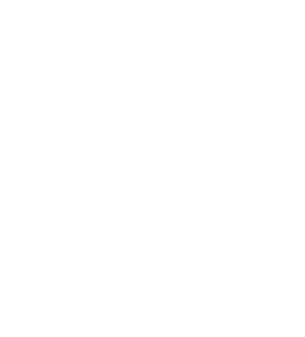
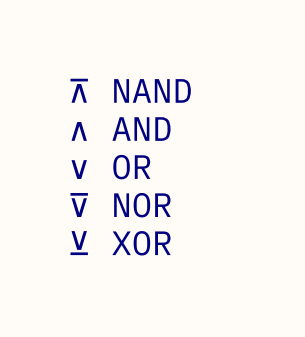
text: none -> ⊼ NAND (130, 90)
text: none -> ∧ AND (121, 129)
text: none -> ∨ OR (110, 167)
text: none -> ⊽ NOR (120, 205)
text: none -> ⊻ XOR (120, 243)

